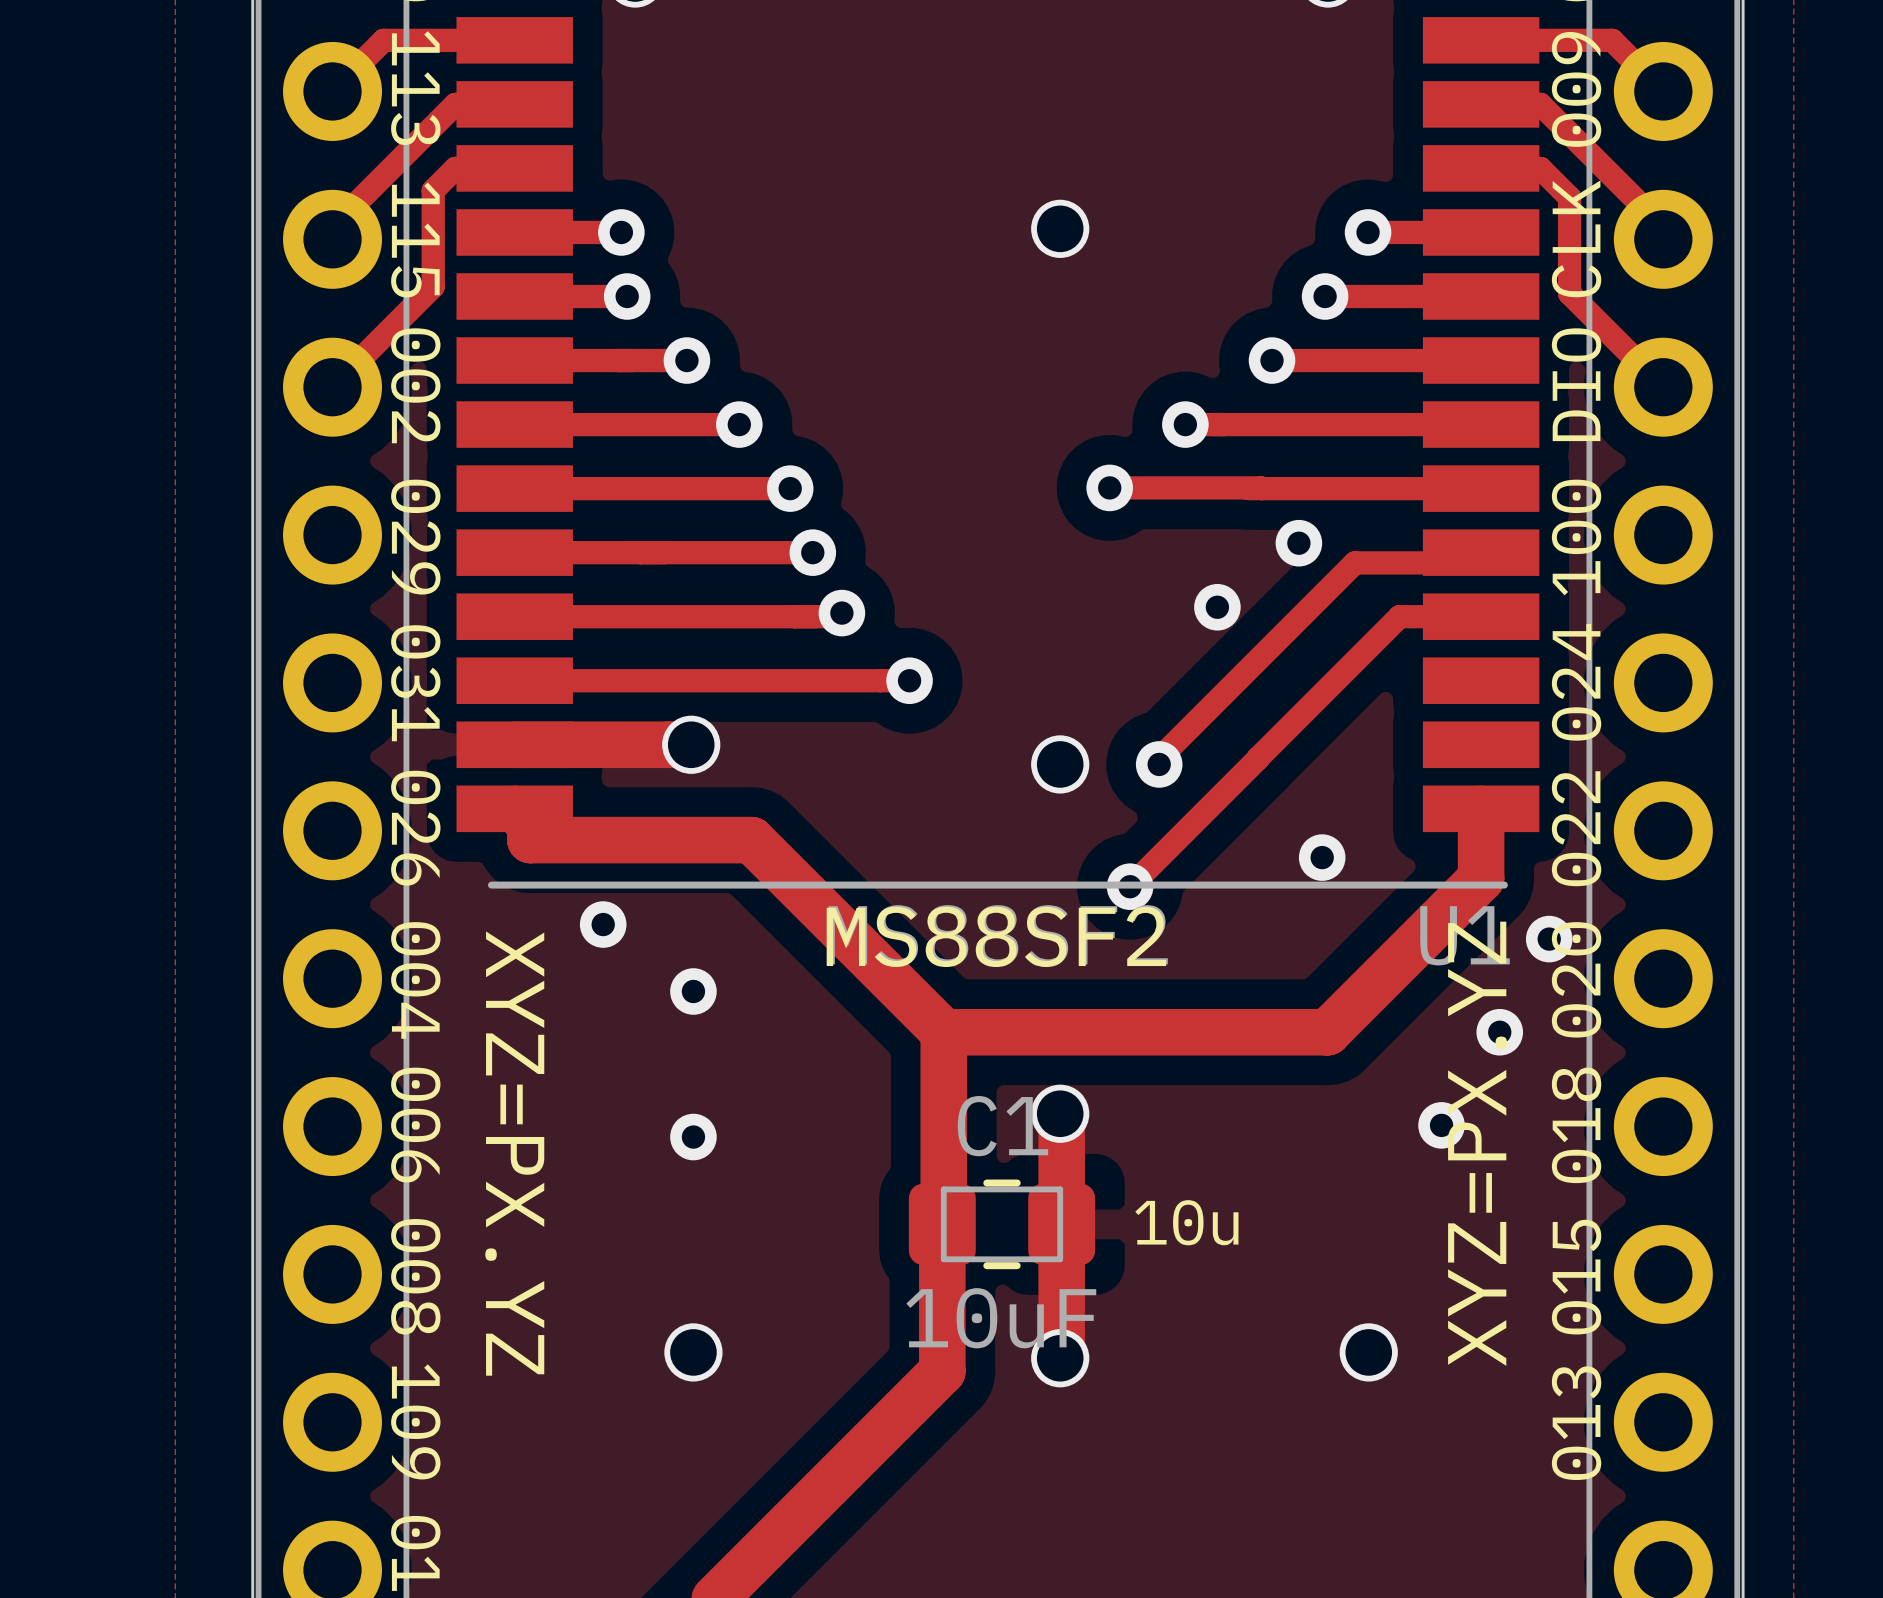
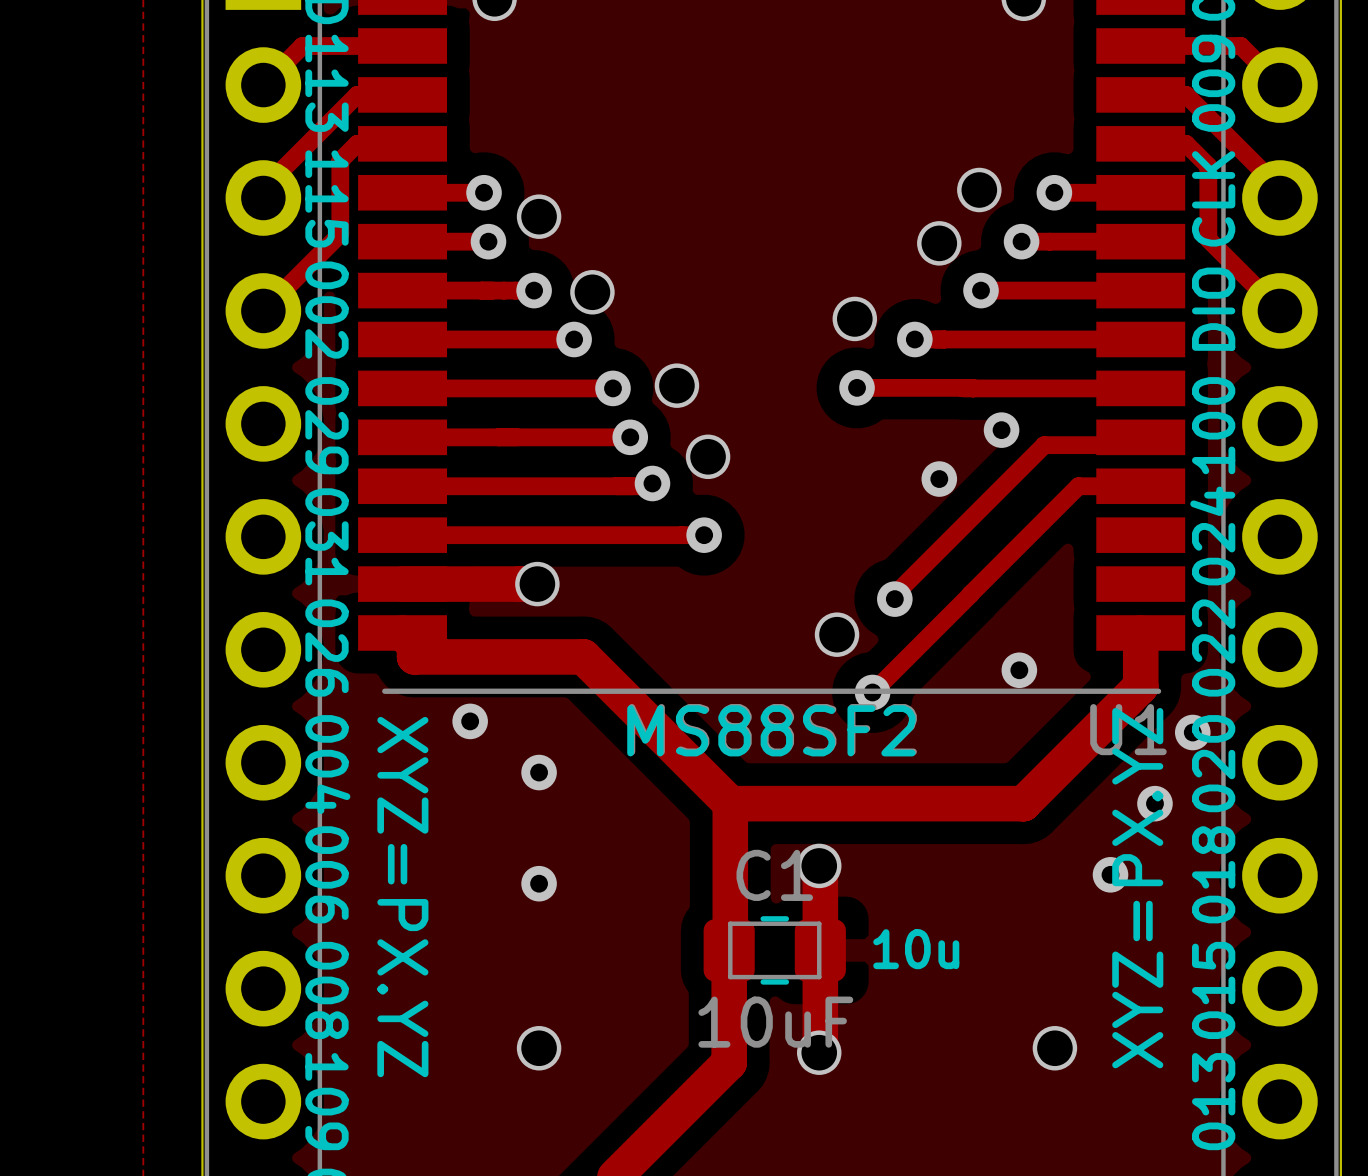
via: (1060, 228) -> none
via: none -> (979, 189)
via: none -> (539, 216)
via: none -> (939, 243)
via: none -> (592, 292)
via: none -> (854, 318)
via: none -> (676, 385)
via: none -> (708, 456)
via position: (1060, 764) -> (837, 634)

